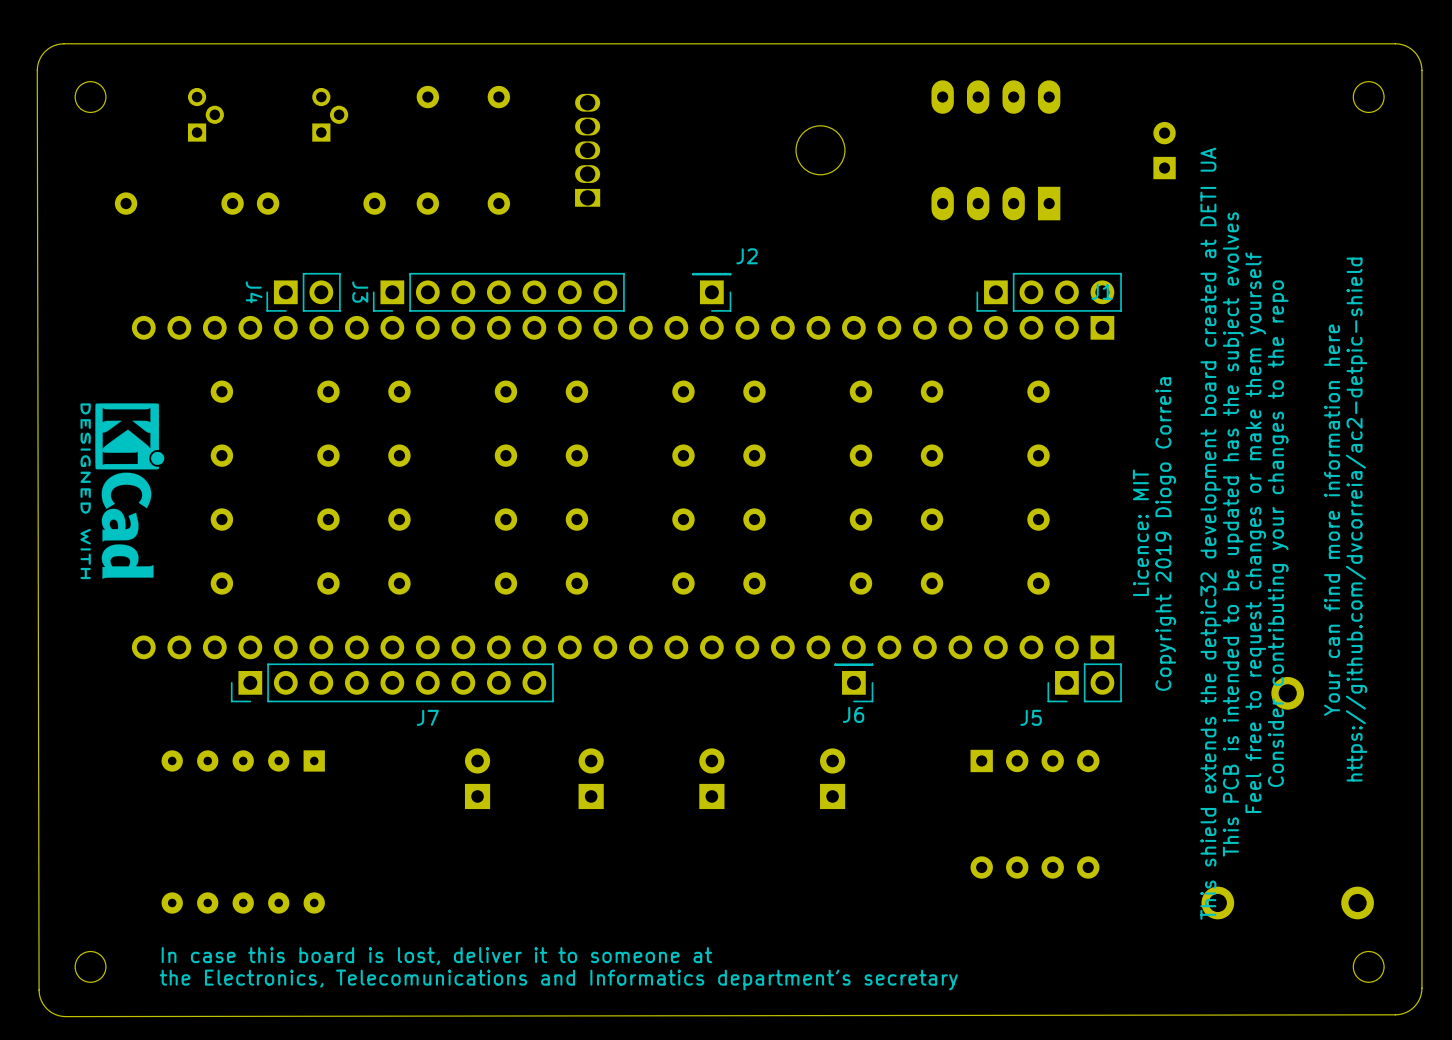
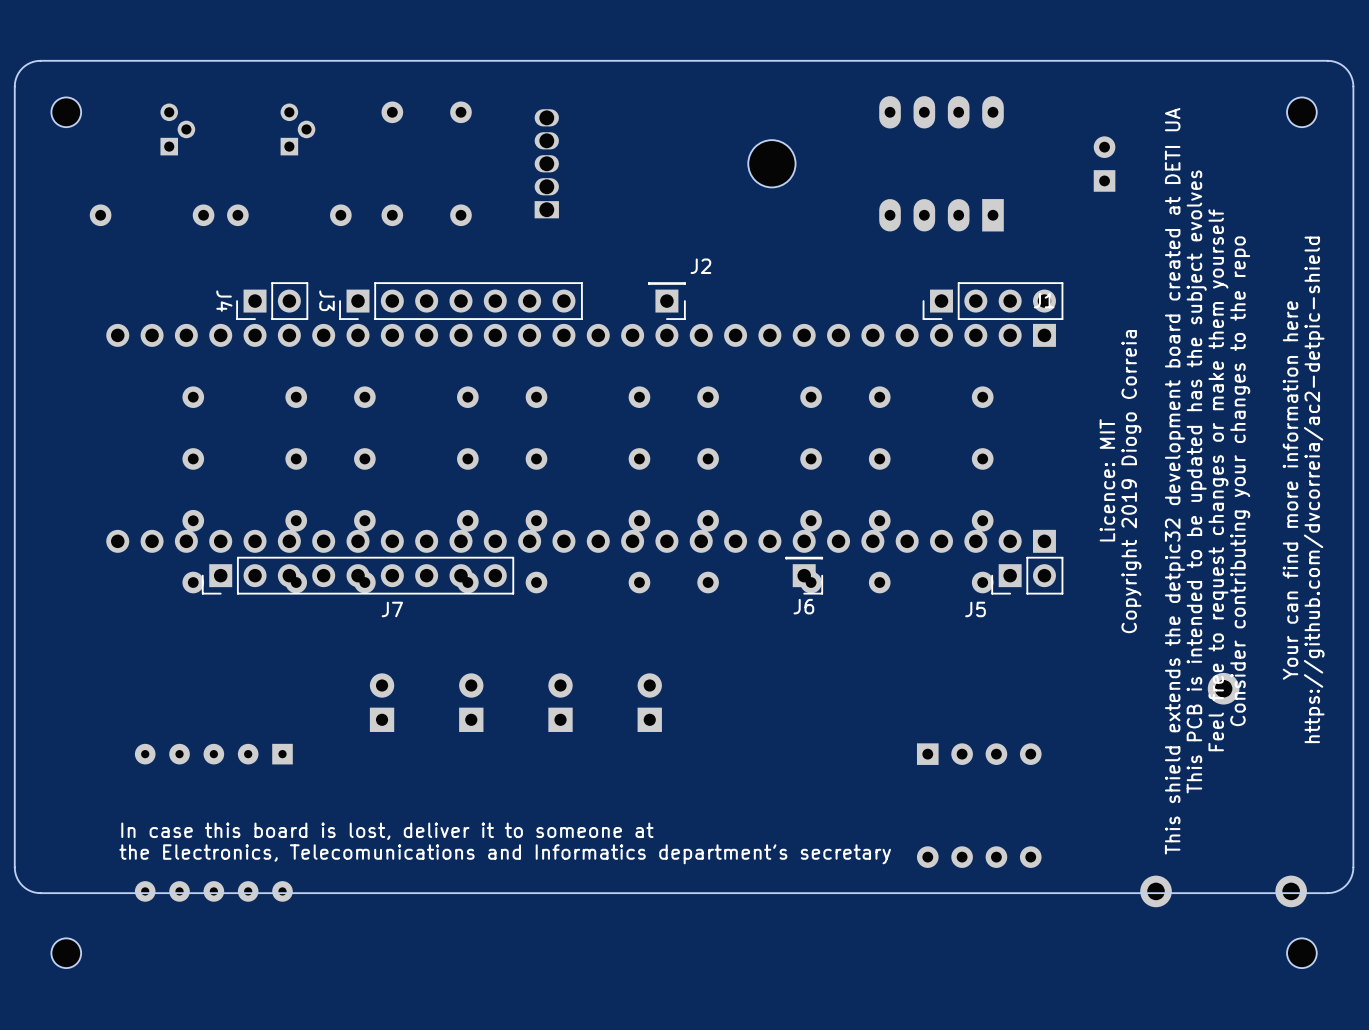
board edge: (37, 70) (39, 989) (42, 1003) (52, 1013) (65, 1016) (1398, 1014) (1414, 1007) (1421, 991) (1421, 878) -> (14, 86) (14, 867) (18, 880) (27, 889) (40, 893) (1327, 893) (1337, 891) (1345, 885) (1351, 877) (1353, 867)
drawing: [80, 403, 165, 580] -> none
text position: https://github.com/dvcorreia/ac2-detpic-shield (1356, 519) -> https://github.com/dvcorreia/ac2-detpic-shield (1314, 489)
text position: Your can find more information here (1332, 520) -> Your can find more information here (1290, 490)
text position: Licence: MIT (1140, 532) -> Licence: MIT (1107, 480)
text position: Feel free to request changes or make them yourself (1255, 532) -> Feel free to request changes or make them yourself (1218, 480)
text position: This shield extends the detpic32 development board created at DETI UA (1210, 533) -> This shield extends the detpic32 development board created at DETI UA (1174, 481)
text position: Consider contributing your changes to the repo (1278, 533) -> Consider contributing your changes to the repo (1240, 481)
text position: Copyright 2019 Diogo Correia (1165, 534) -> Copyright 2019 Diogo Correia (1131, 481)
text position: This PCB is intended to be updated has the subject evolves (1233, 534) -> This PCB is intended to be updated has the subject evolves (1196, 481)
part position: (623, 647) -> (581, 541)
J7 position: (392, 682) -> (358, 575)
J6 position: (853, 682) -> (804, 575)
J5 position: (1084, 682) -> (1027, 575)
part: none -> (382, 702)
part: none -> (471, 702)
part: none -> (560, 702)
part: none -> (649, 702)
part: (477, 778) -> none
part: (591, 778) -> none
part: (711, 778) -> none
part: (832, 778) -> none
text position: In case this board is lost, deliver it to someone at (436, 956) -> In case this board is lost, deliver it to someone at (387, 831)
text position: the Electronics, Telecomunications and Informatics department's secretary (558, 979) -> the Electronics, Telecomunications and Informatics department's secretary (505, 854)

